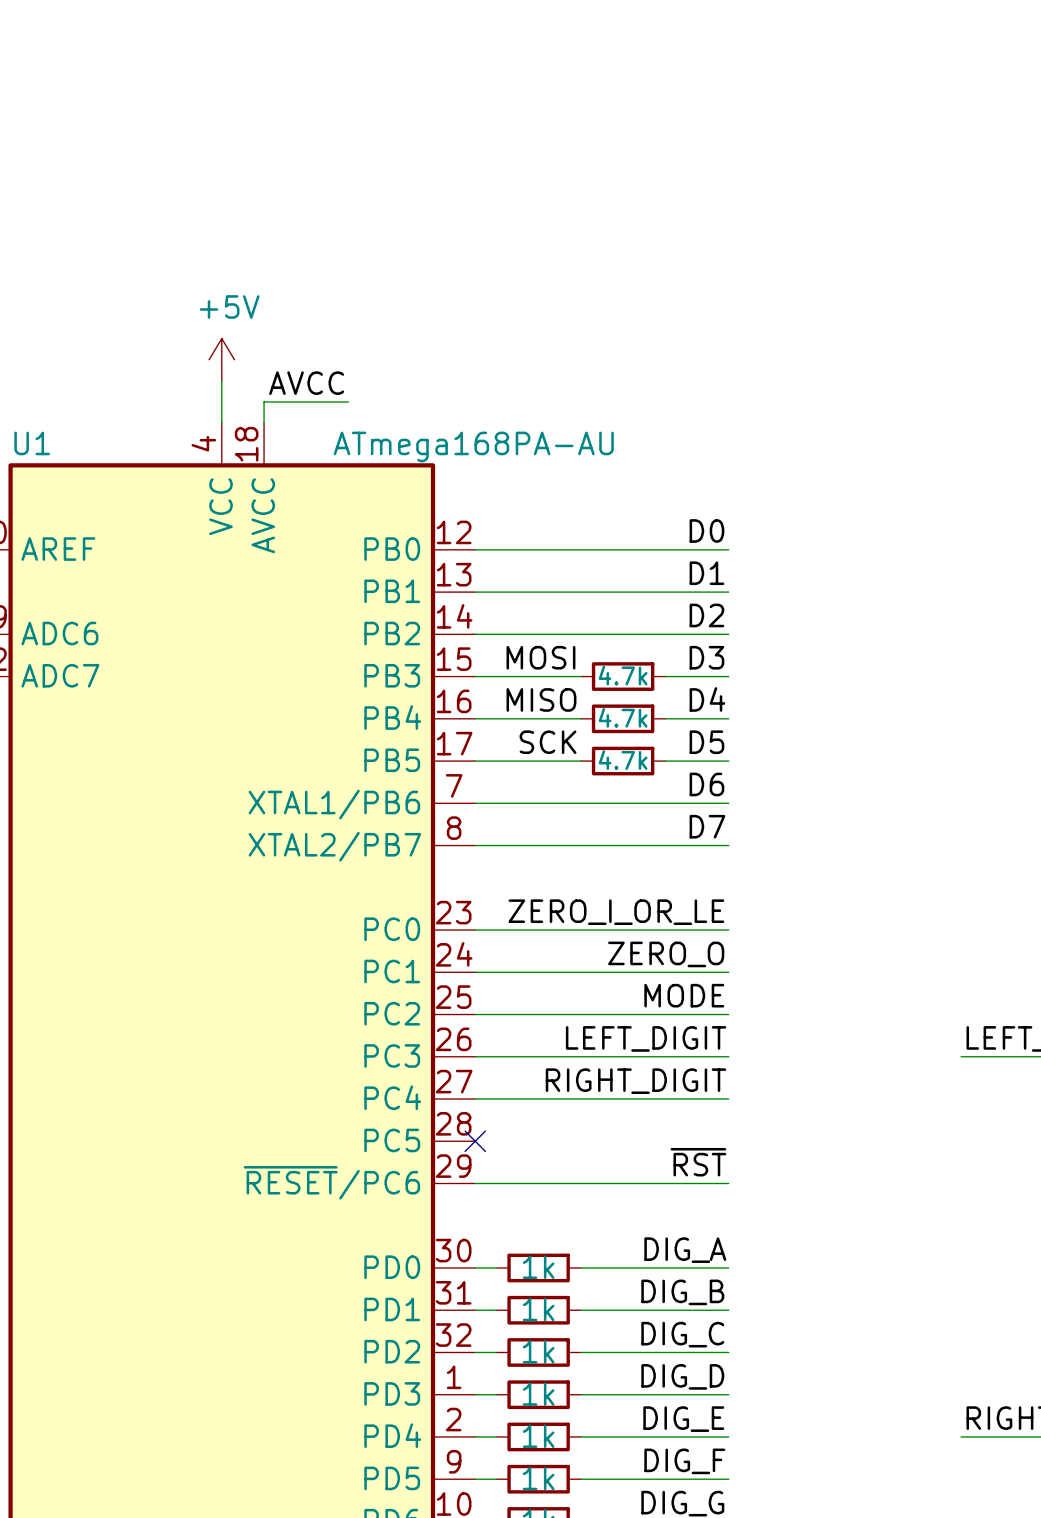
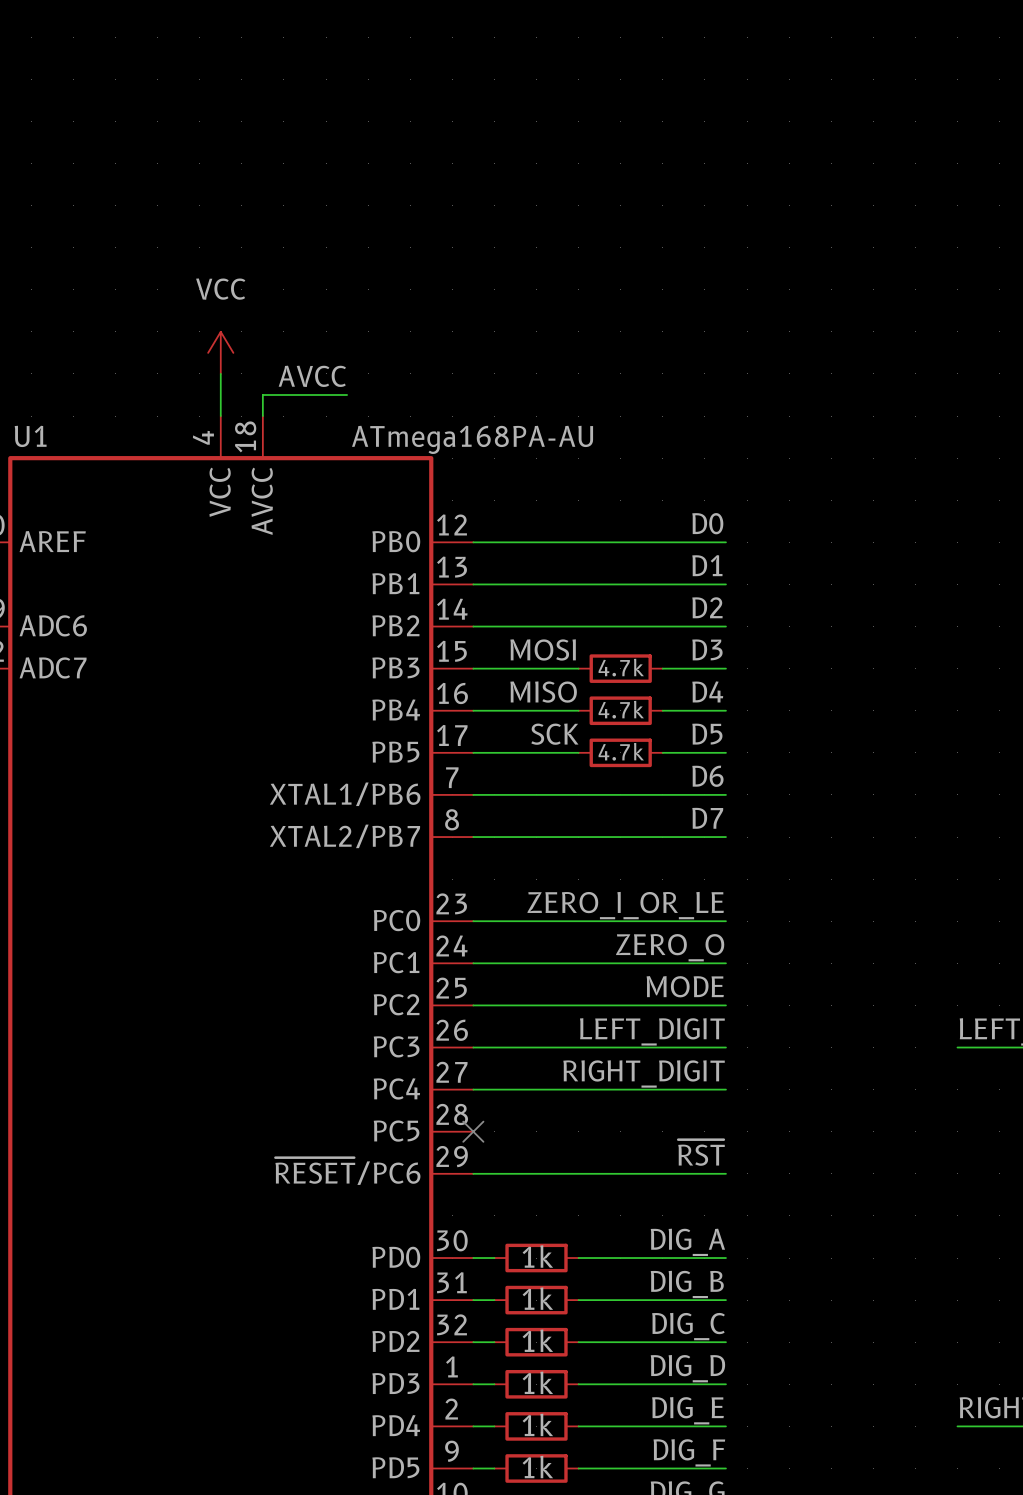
power symbol: +5V (221, 359) -> VCC (220, 352)

